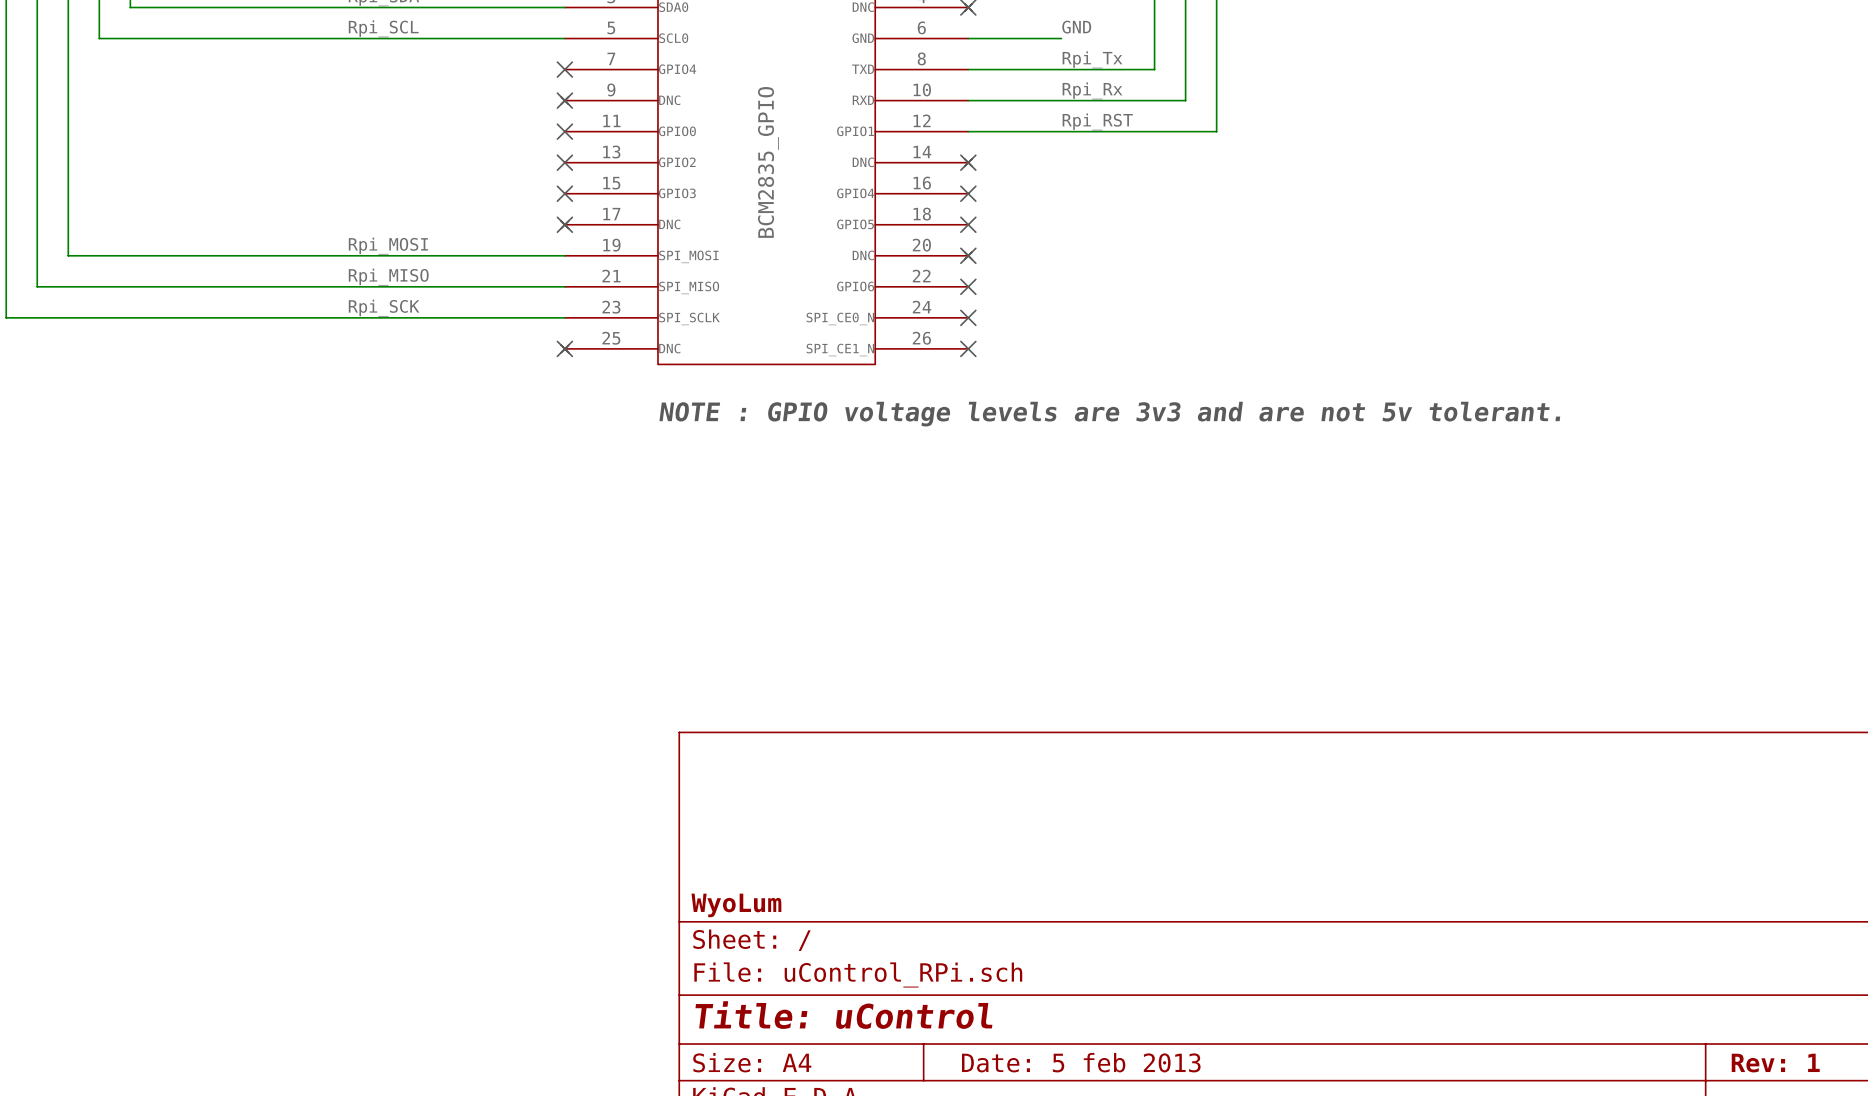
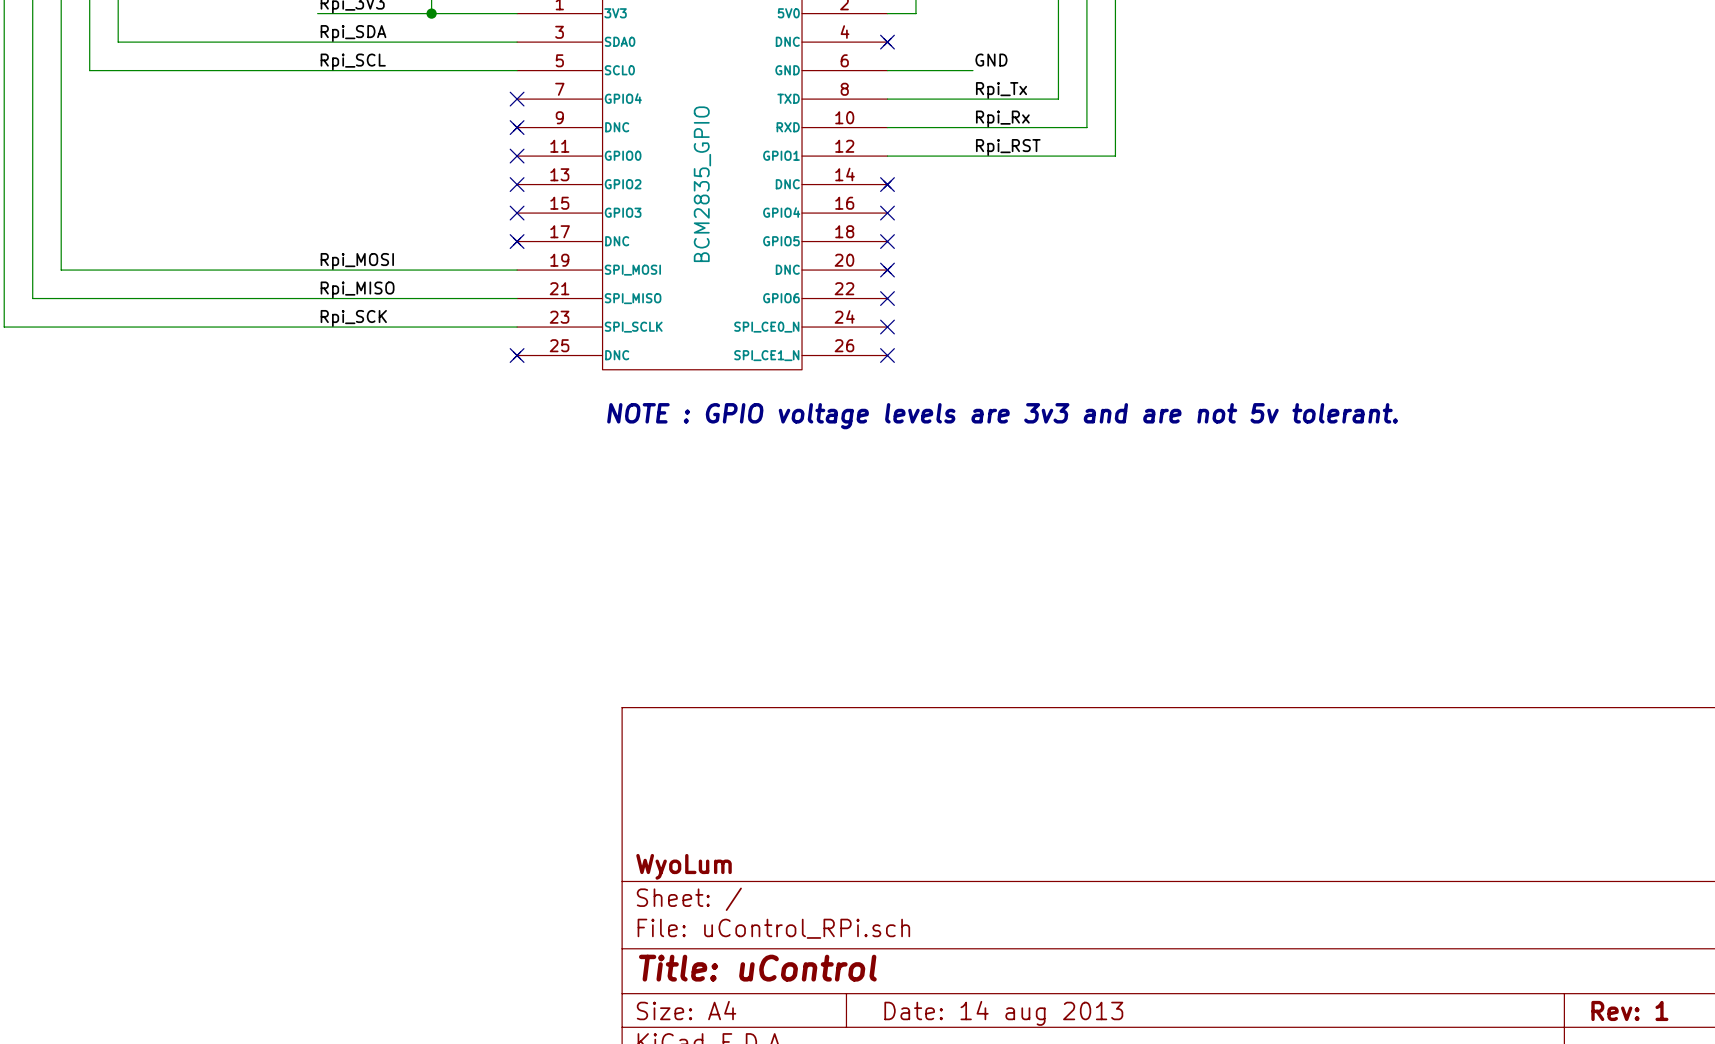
title block: Date: 5 feb 2013 (1081, 1062) -> Date: 14 aug 2013 (1003, 1013)

